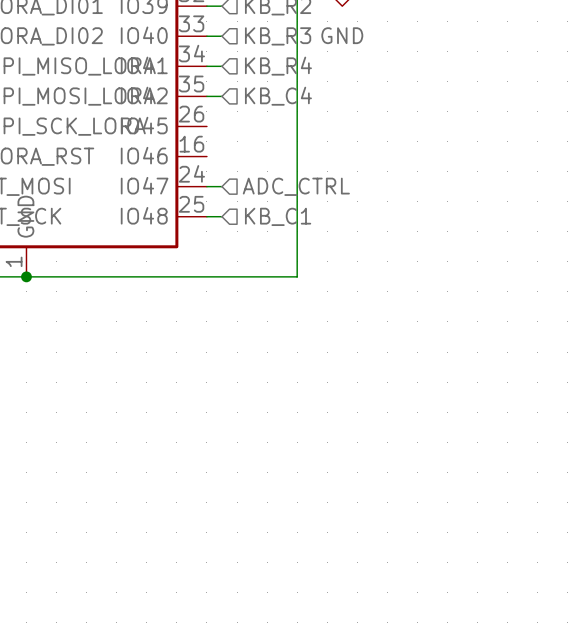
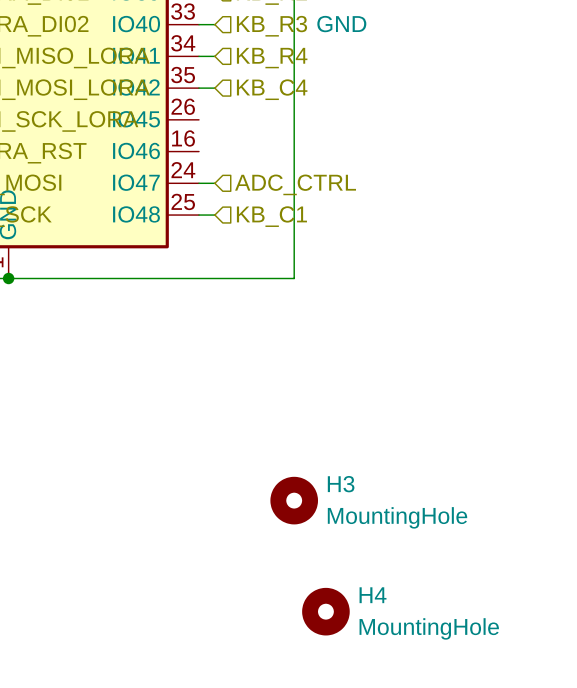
H3: none -> MountingHole (294, 500)
H4: none -> MountingHole (325, 611)

